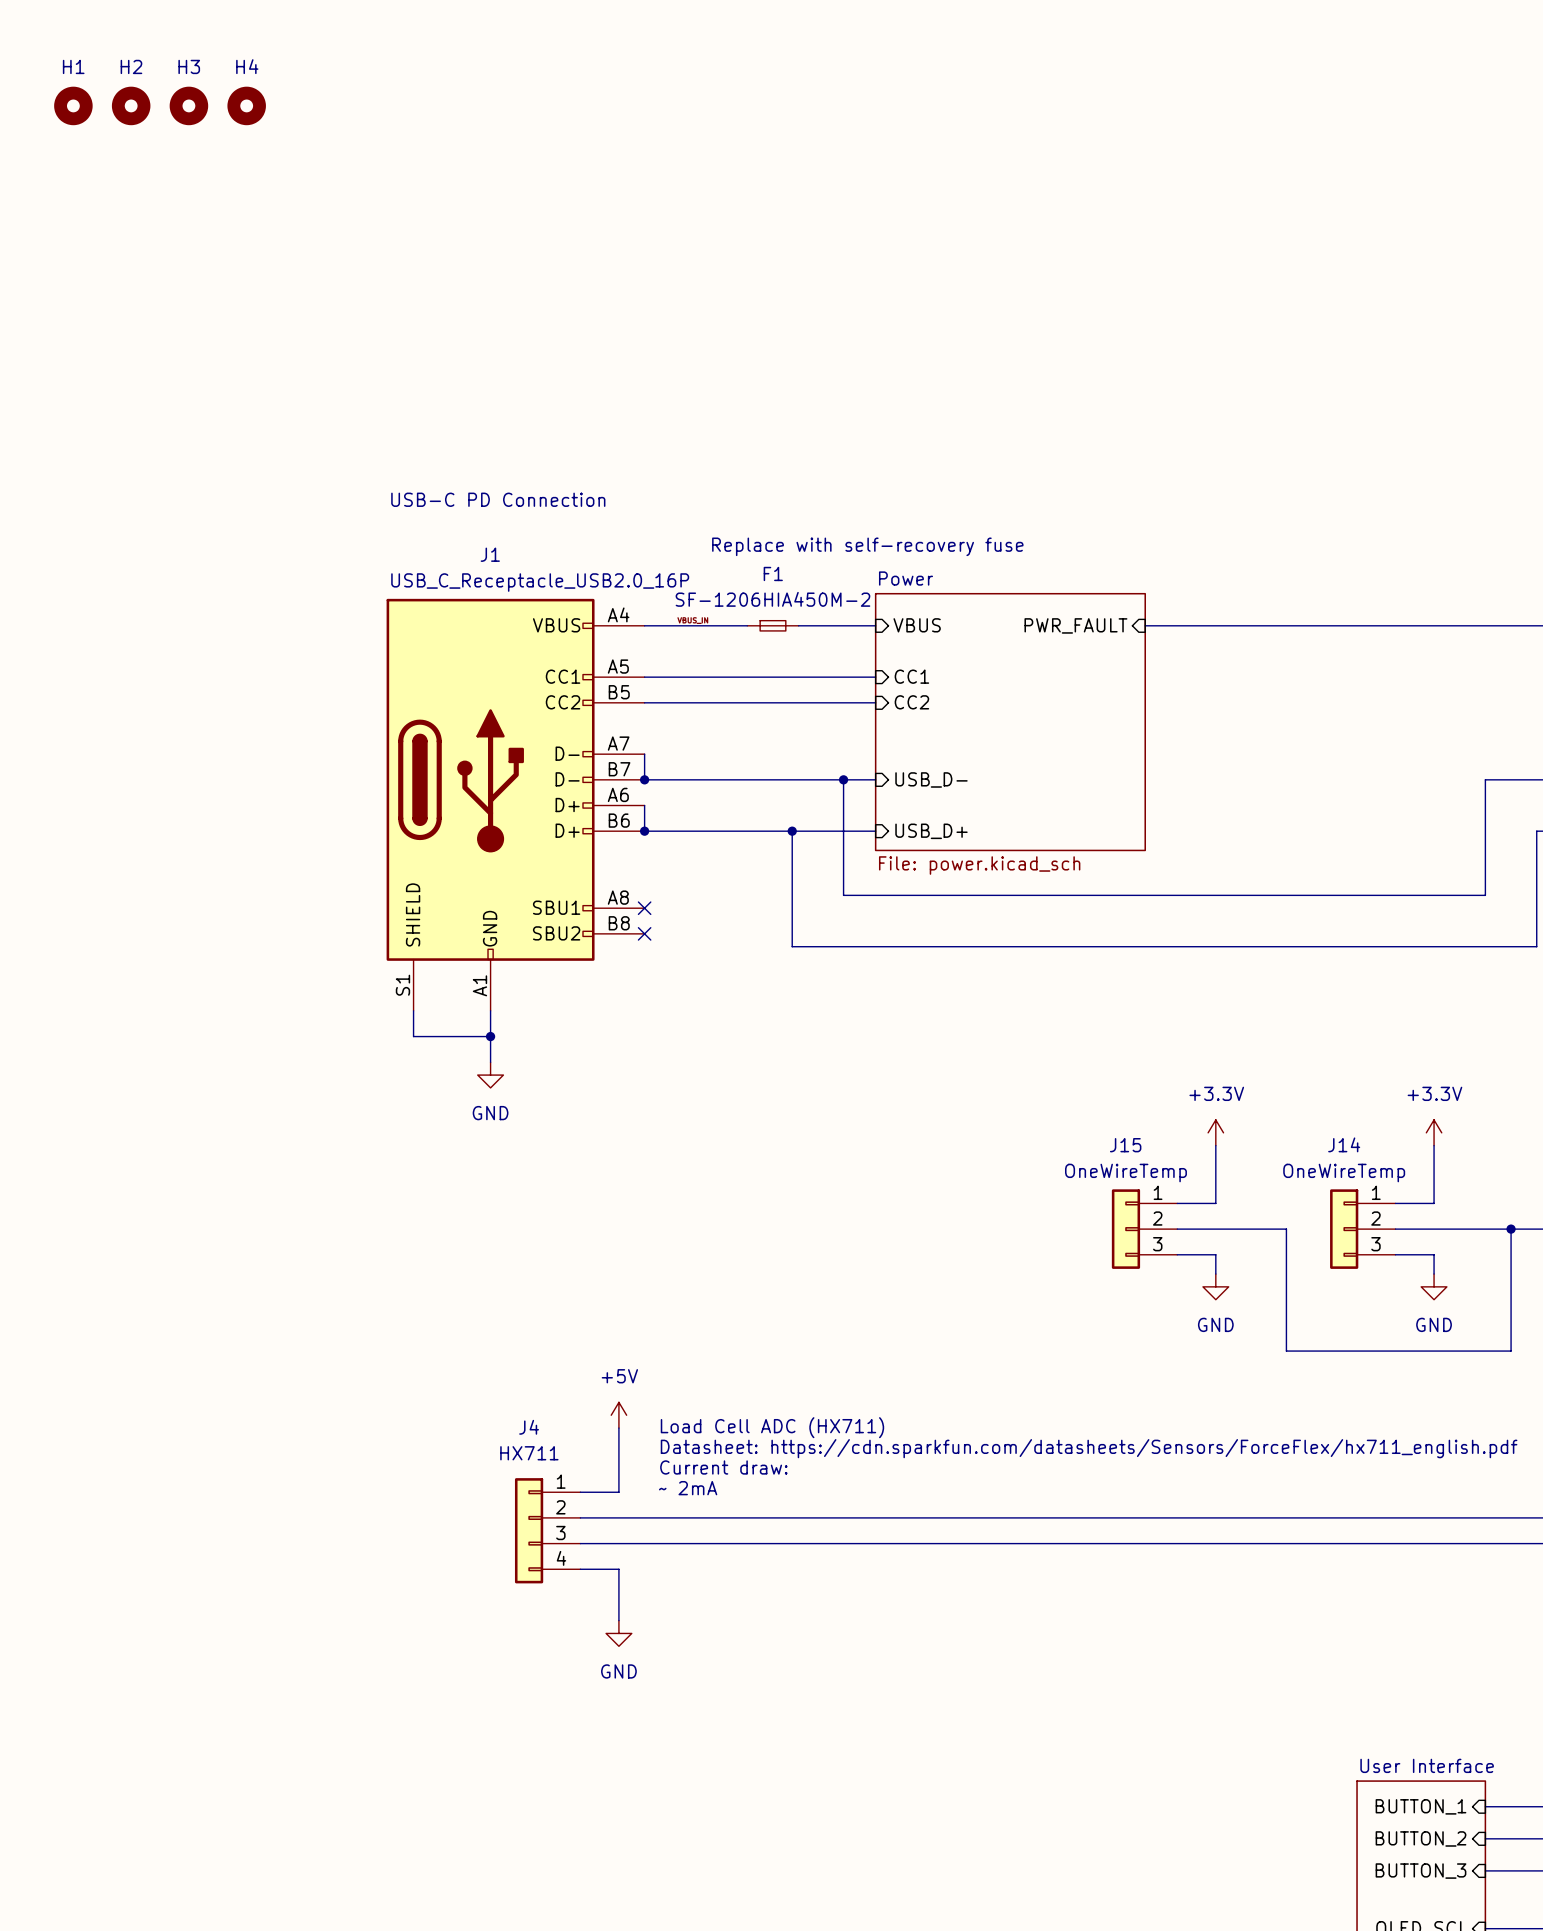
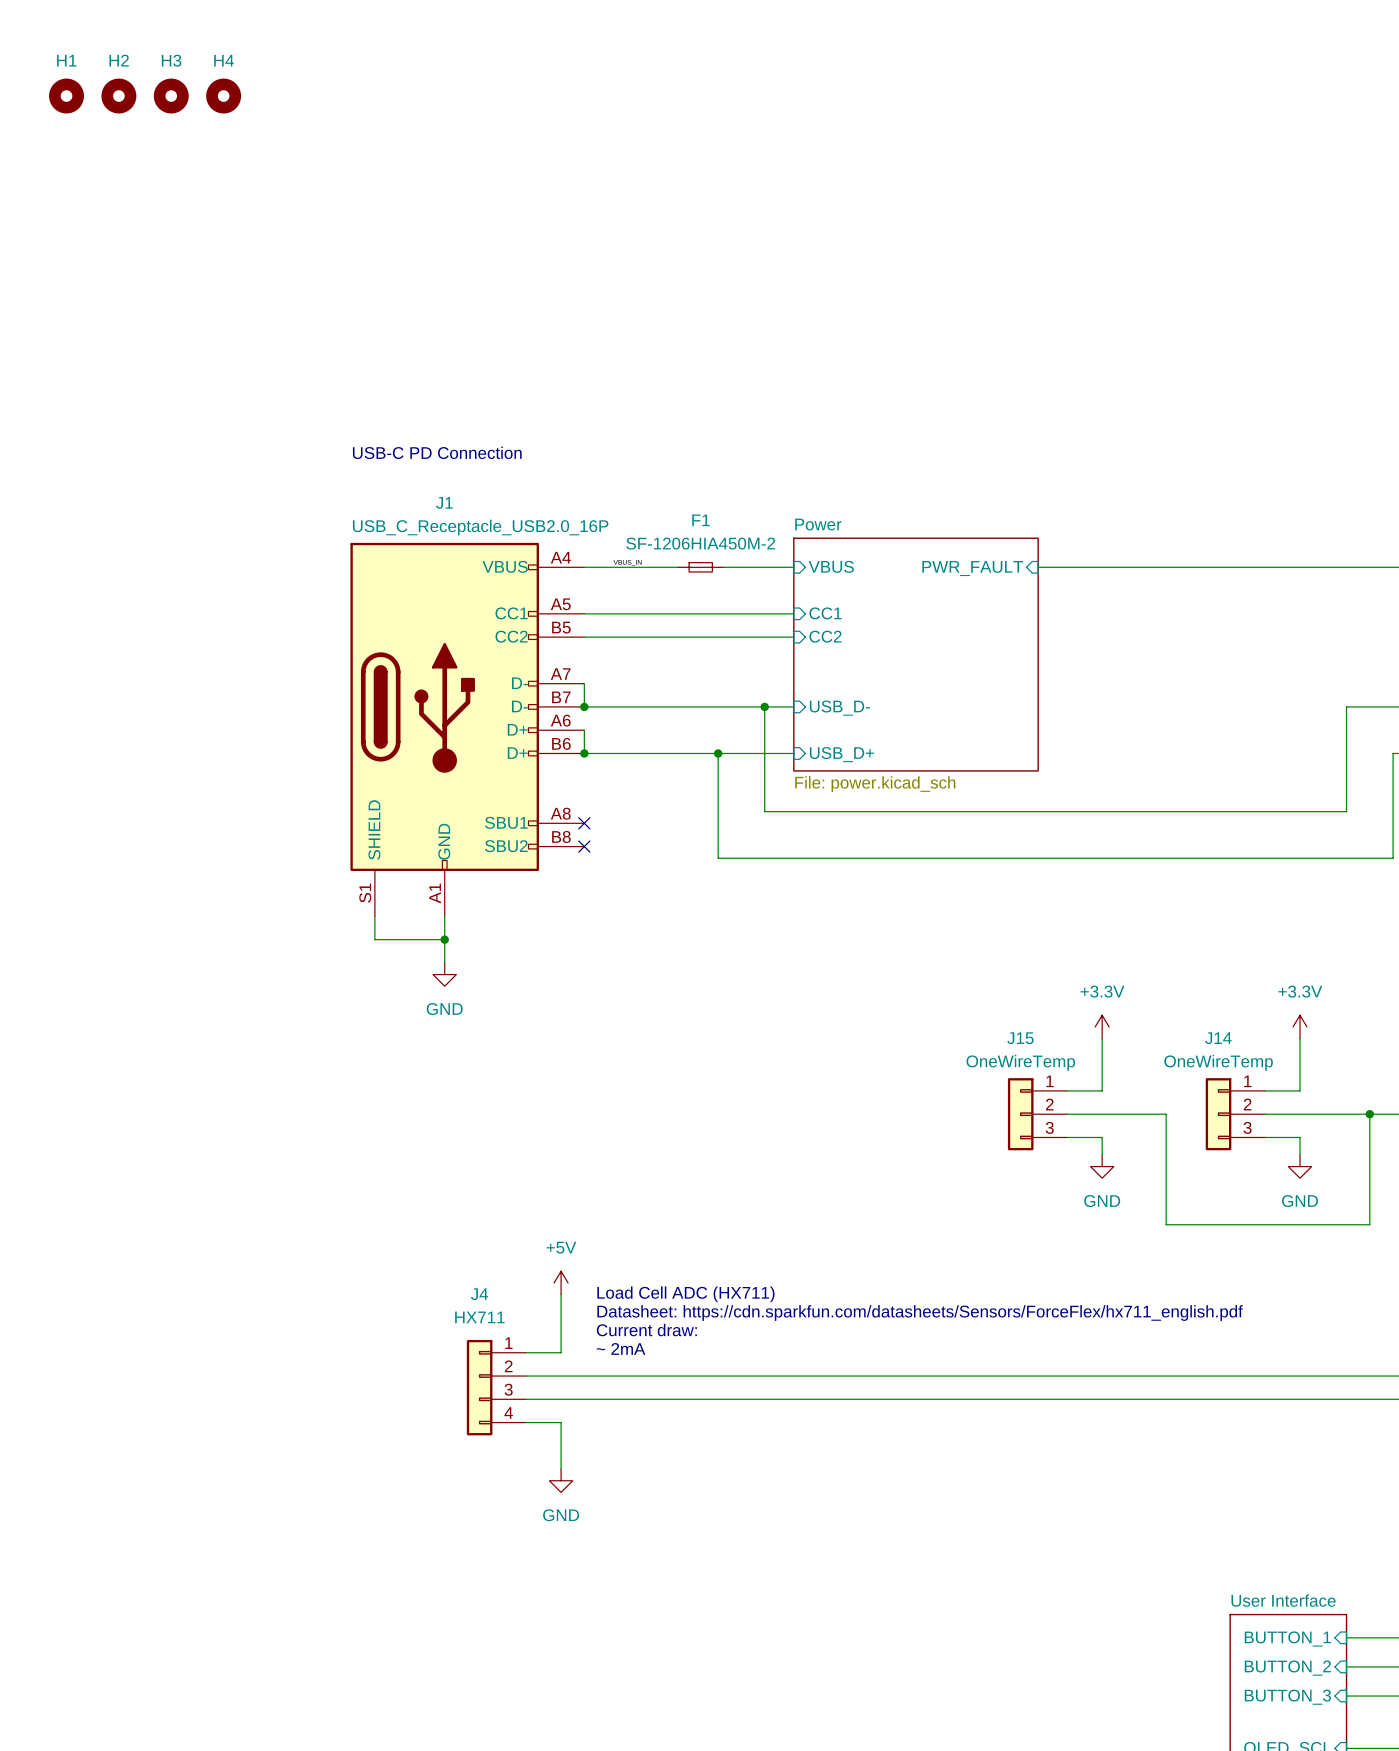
text: Replace with self-recovery fuse (867, 546) -> none

